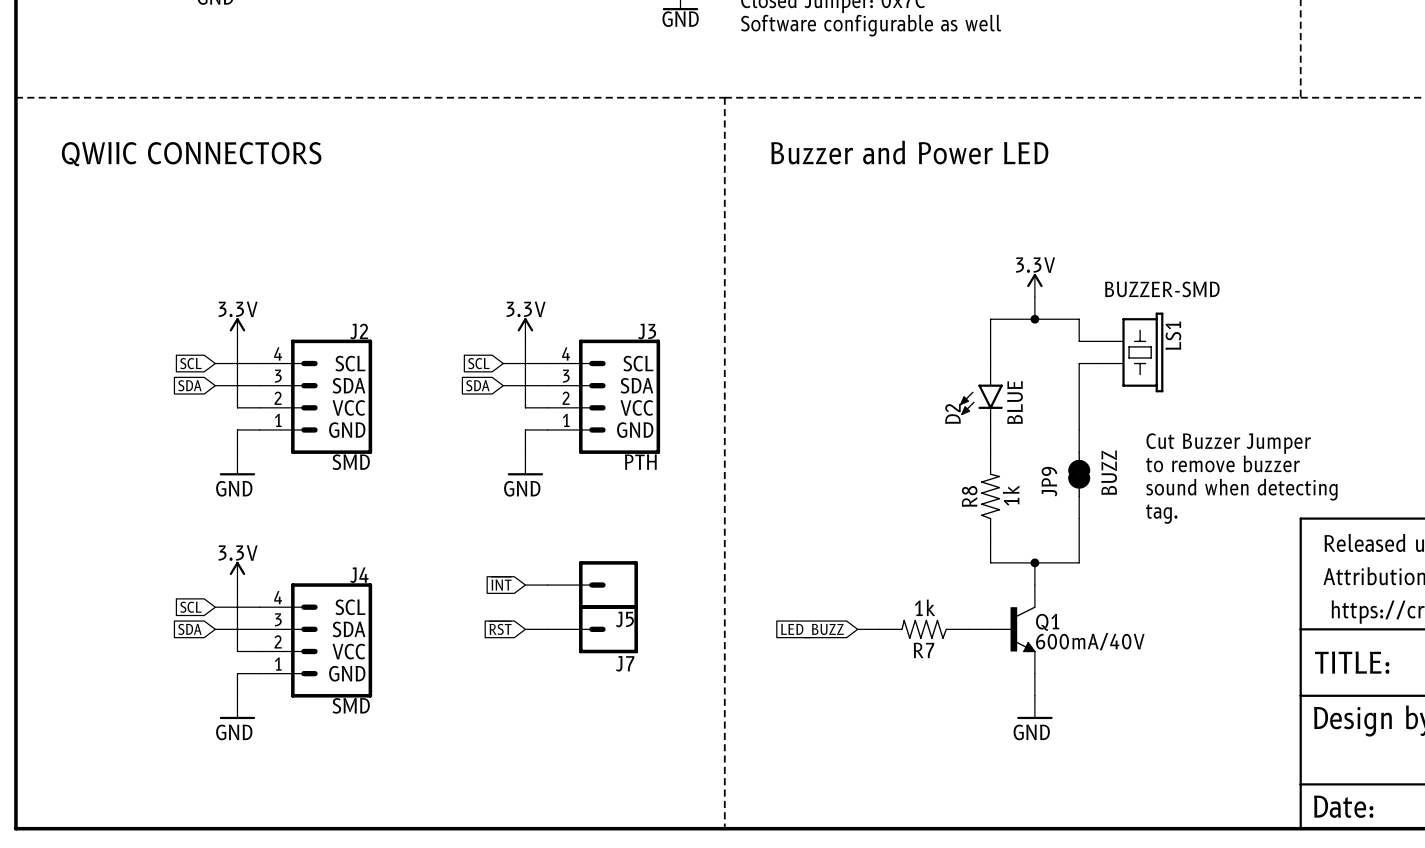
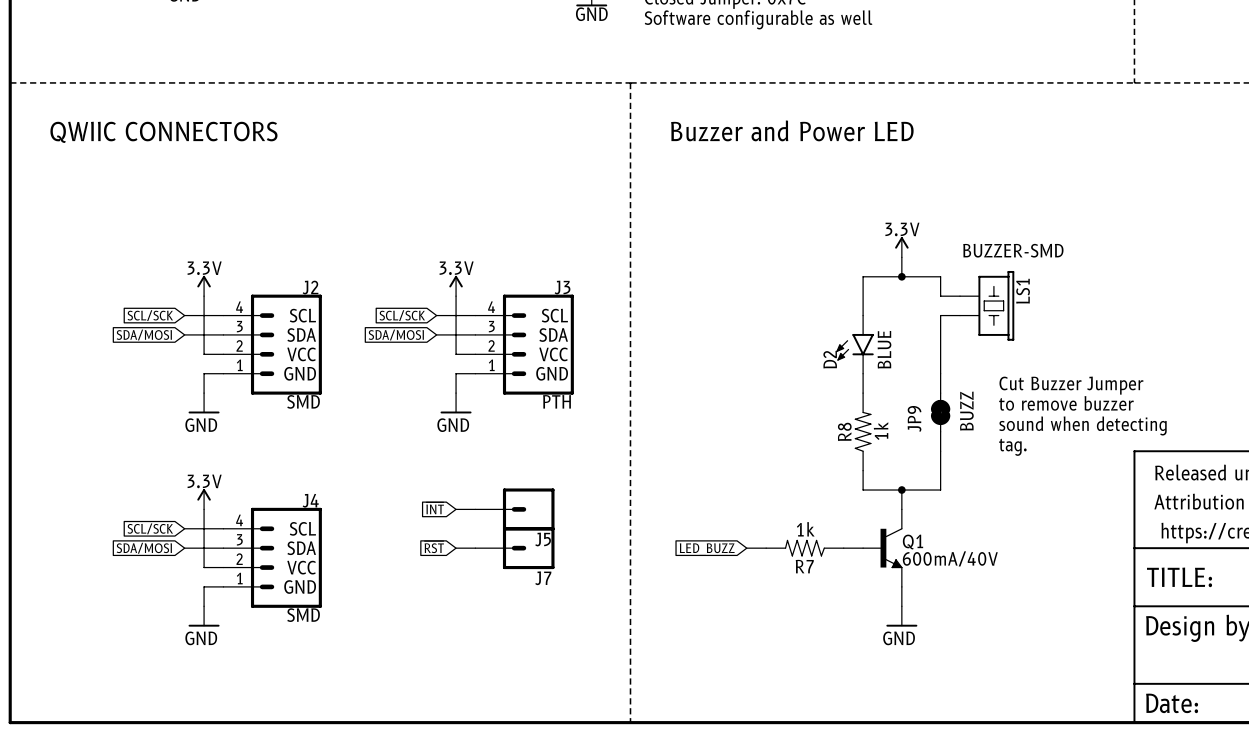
global label: SCL (190, 363) -> SCL/SCK (150, 315)
global label: SCL (478, 363) -> SCL/SCK (402, 315)
global label: SDA (189, 385) -> SDA/MOSI (144, 335)
global label: SDA (477, 385) -> SDA/MOSI (396, 335)
global label: SCL (190, 607) -> SCL/SCK (150, 528)
global label: SDA (189, 629) -> SDA/MOSI (144, 548)

